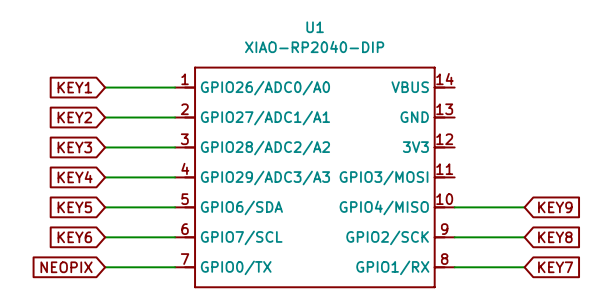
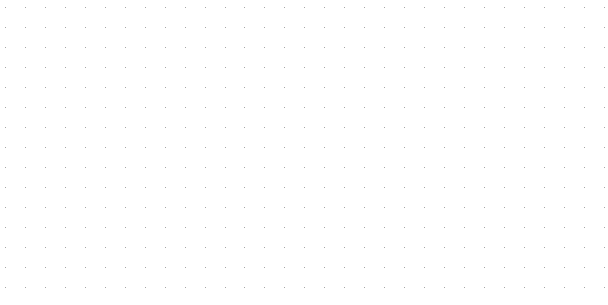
global label: KEY1 (74, 87) -> none
wire: (105, 87) (175, 87) -> none
global label: KEY2 (74, 117) -> none
wire: (105, 117) (175, 117) -> none
global label: KEY3 (74, 147) -> none
wire: (105, 147) (175, 147) -> none
global label: KEY4 (75, 177) -> none
wire: (105, 177) (175, 177) -> none
U1: XIAO-RP2040-DIP (314, 177) -> none
global label: KEY5 (74, 207) -> none
wire: (105, 207) (175, 207) -> none
wire: (454, 207) (524, 207) -> none
global label: KEY9 (555, 207) -> none
global label: KEY6 (74, 237) -> none
wire: (105, 237) (175, 237) -> none
wire: (454, 237) (524, 237) -> none
global label: KEY8 (555, 237) -> none
global label: NEOPIX (66, 267) -> none
wire: (105, 267) (175, 267) -> none
wire: (454, 267) (524, 267) -> none
global label: KEY7 (555, 267) -> none

